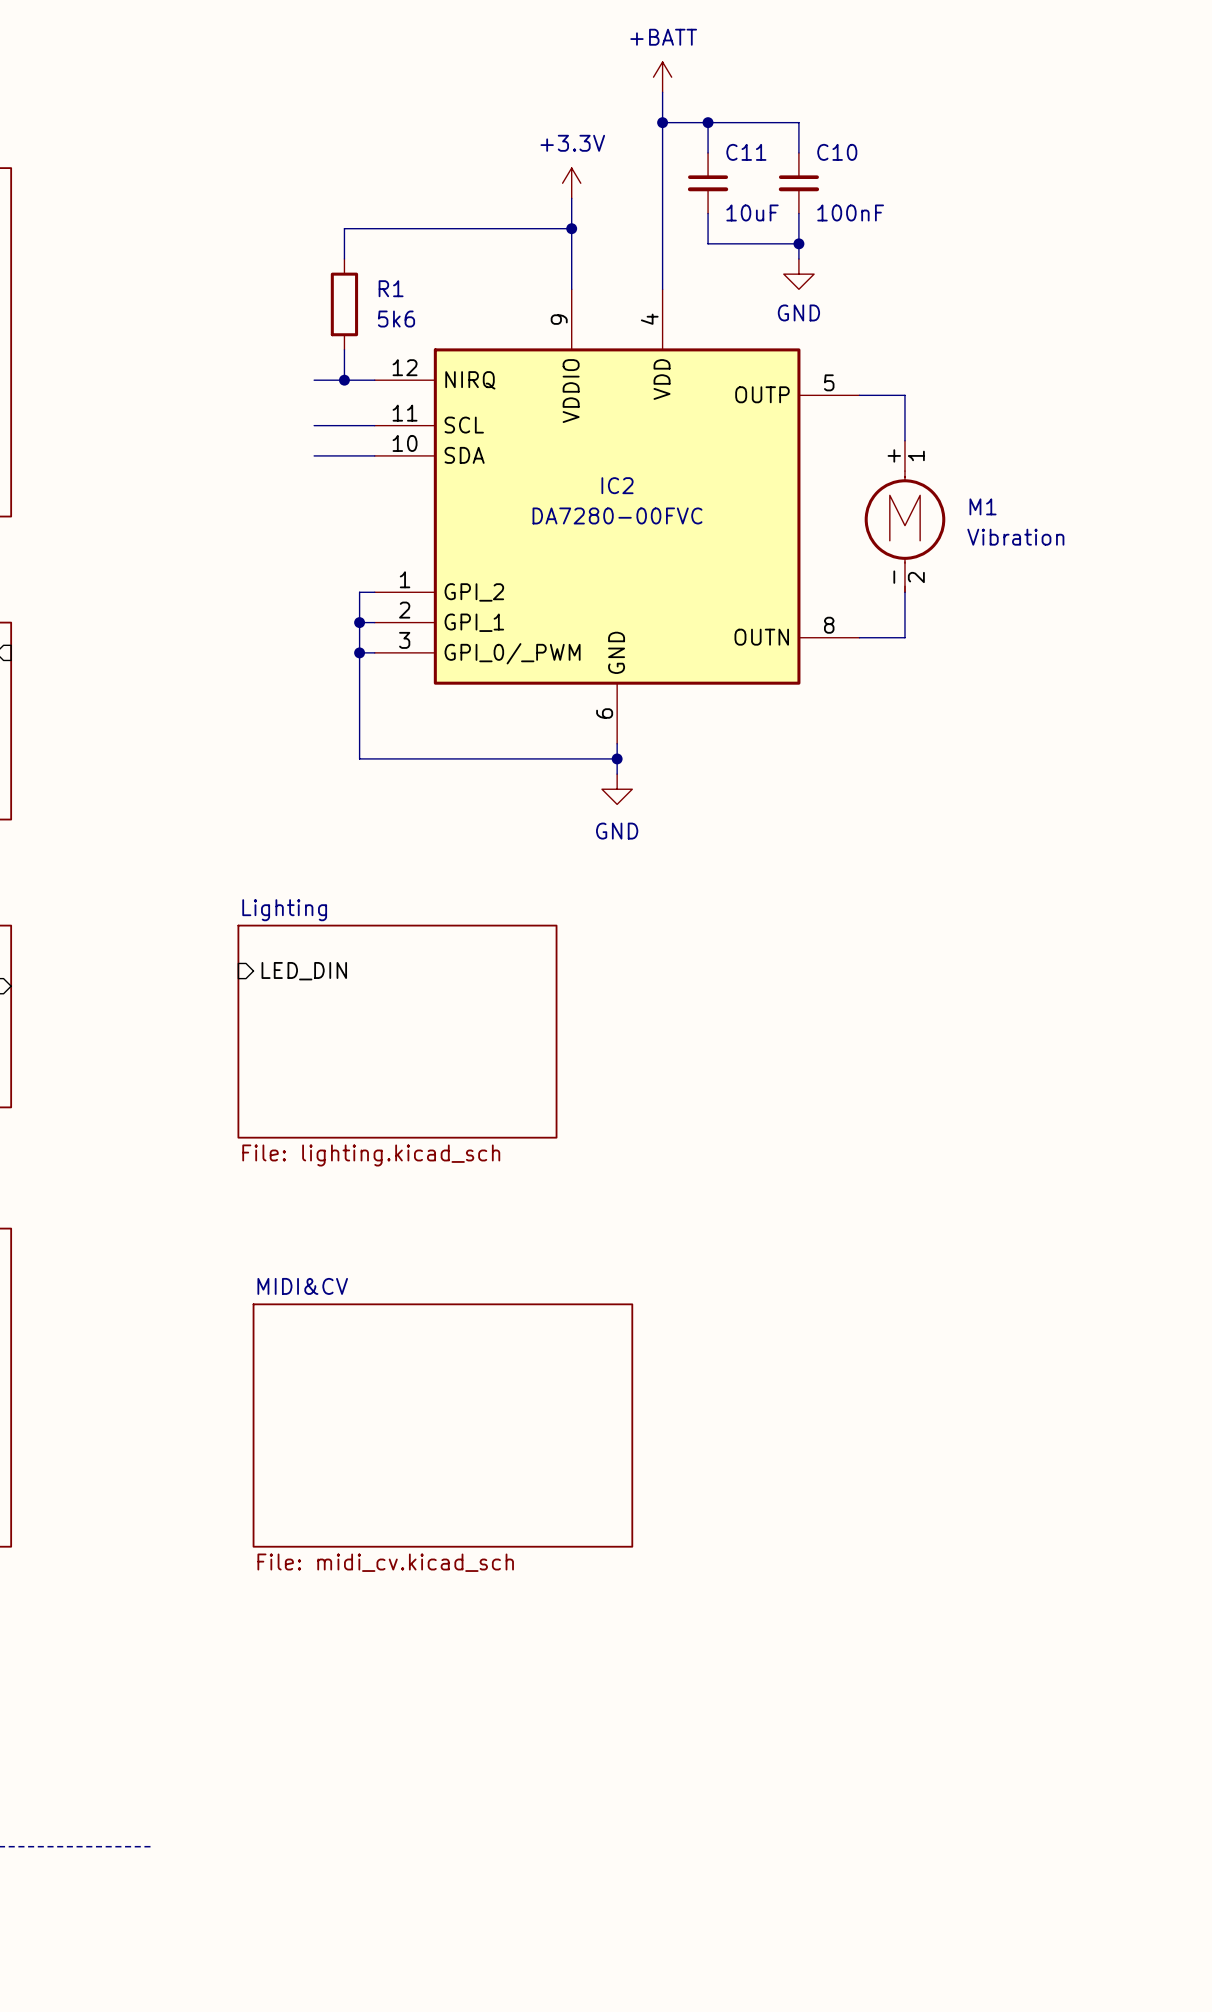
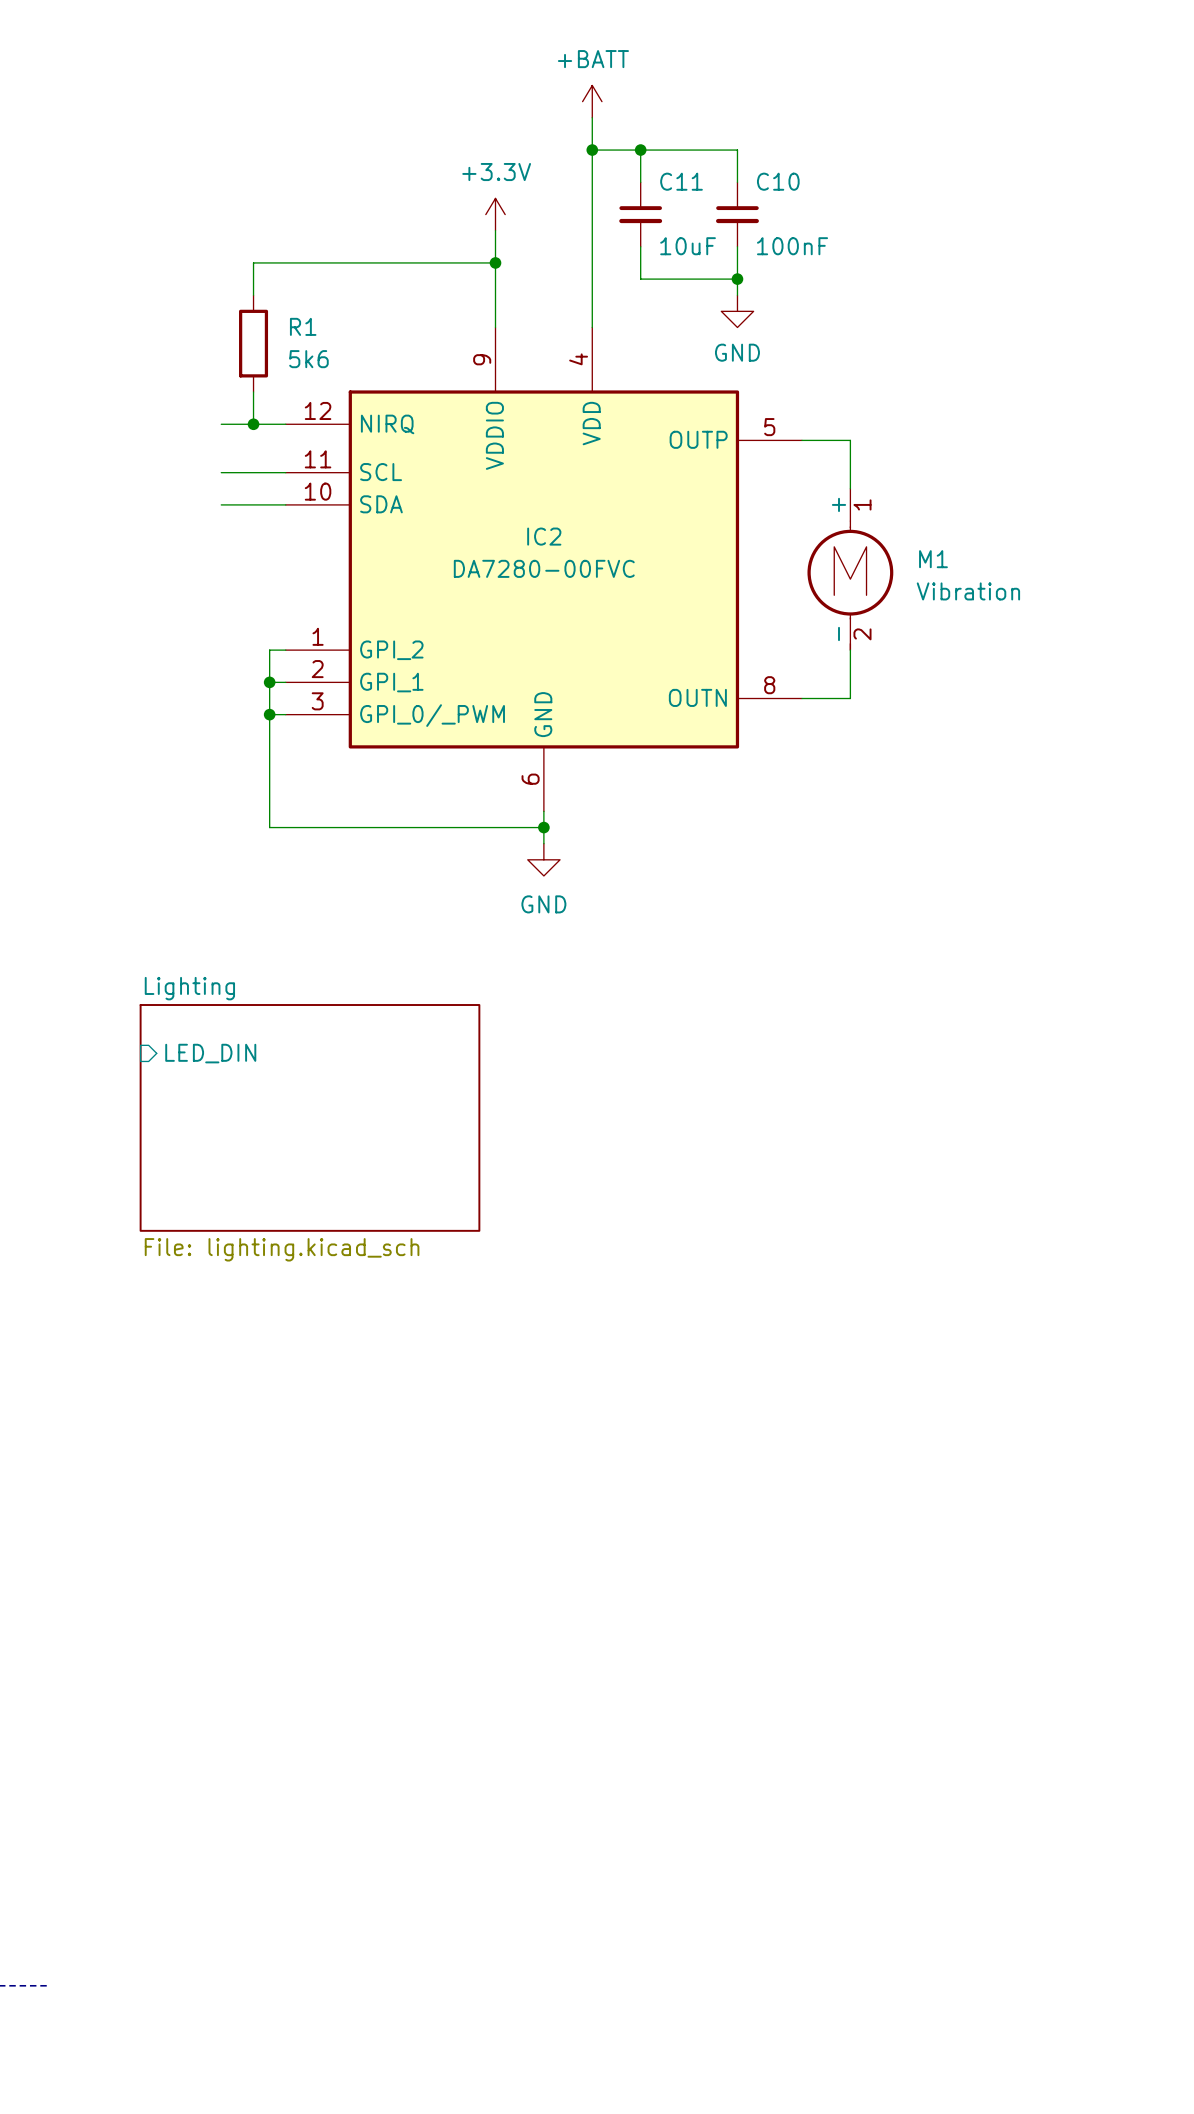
sheet MIDI&CV: File: midi_cv.kicad_sch (442, 1425) -> none

